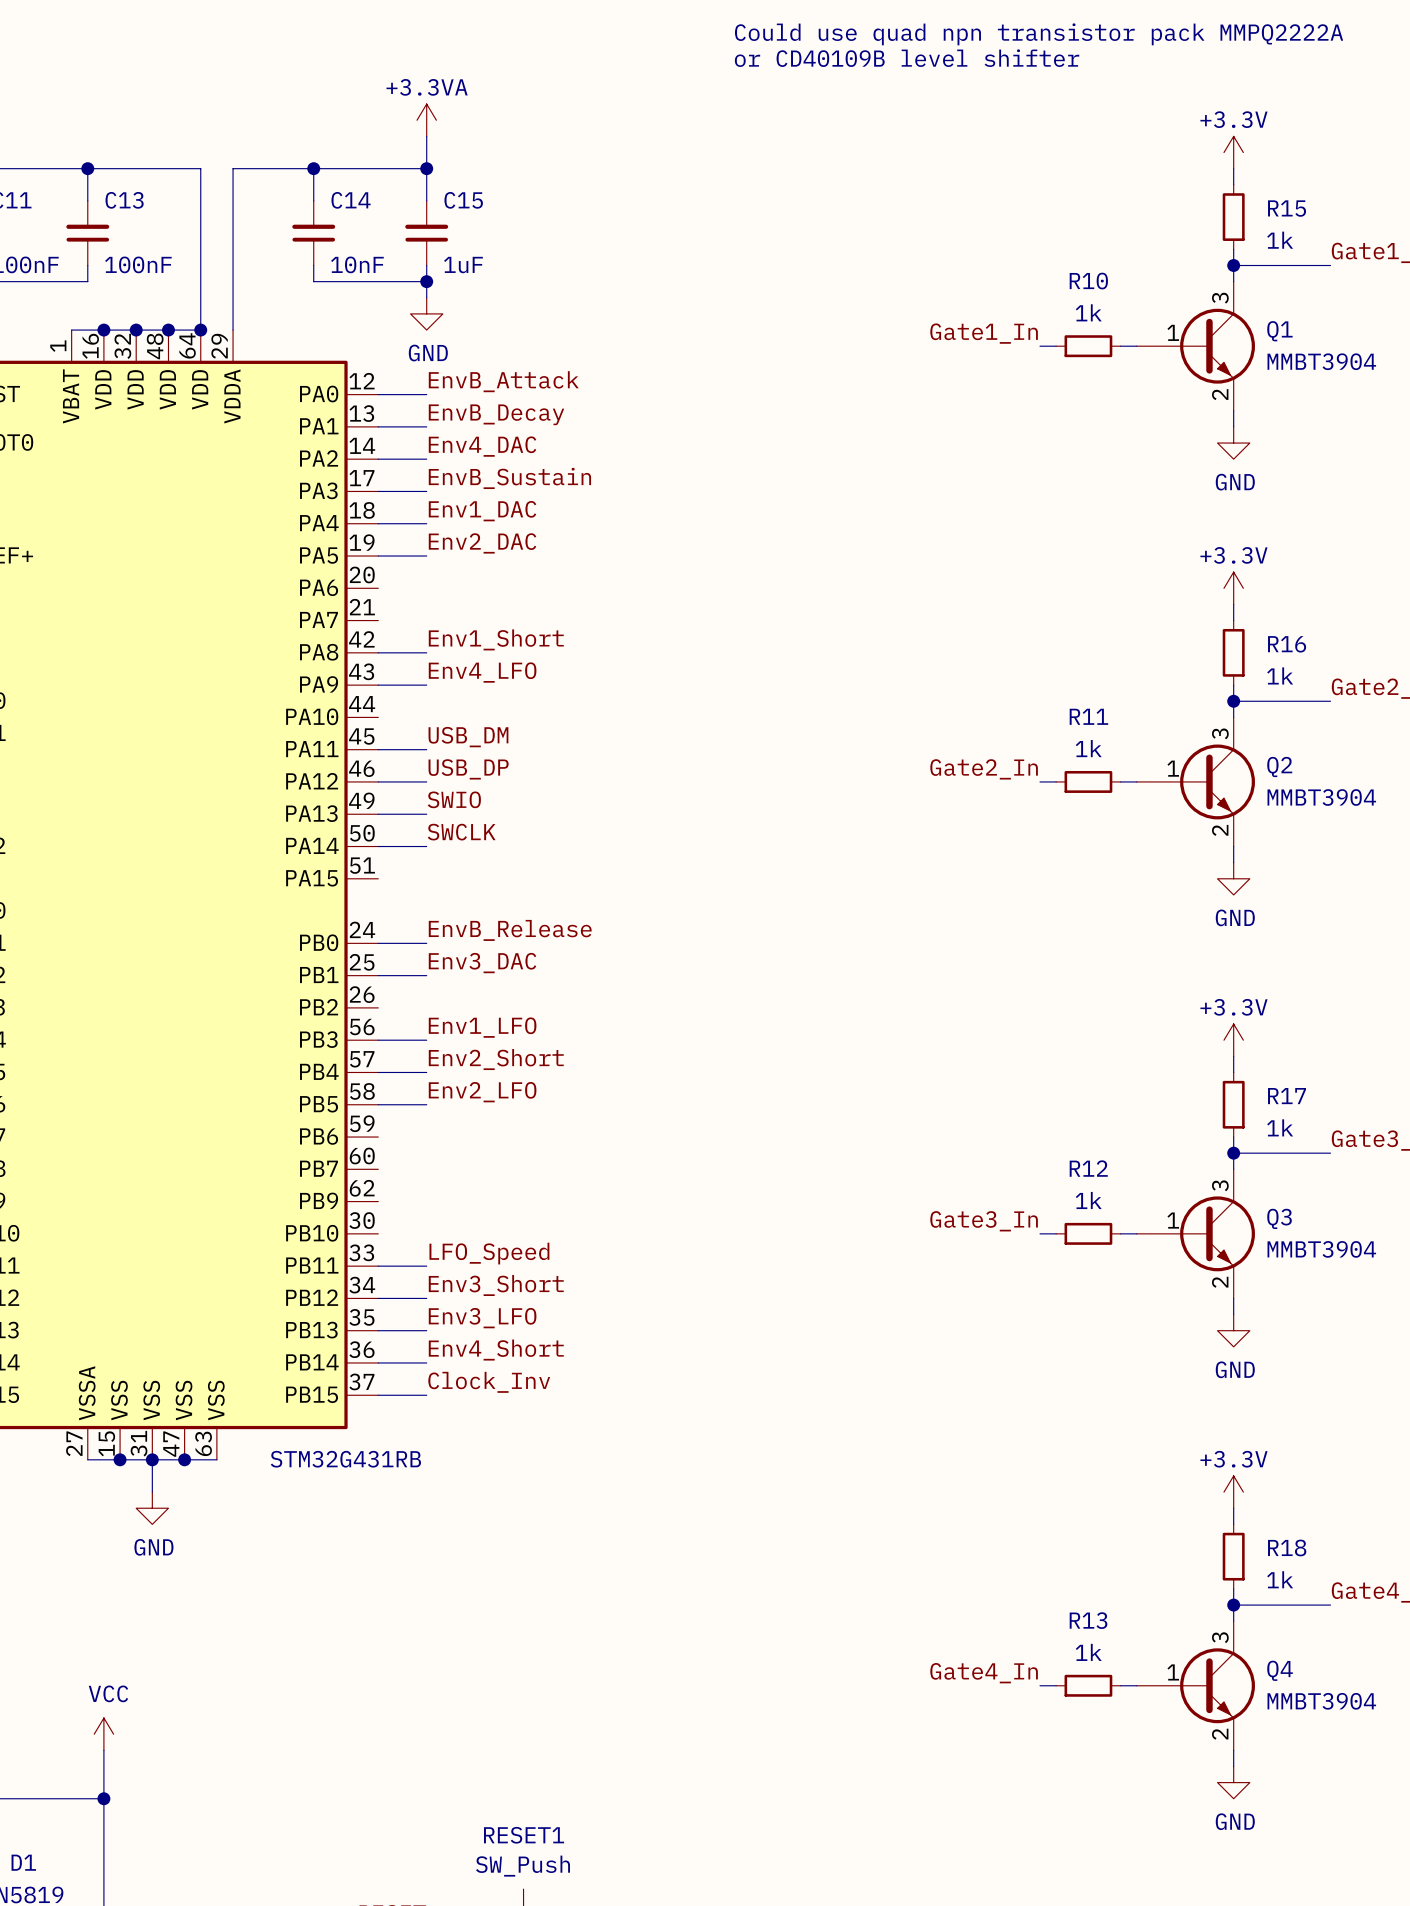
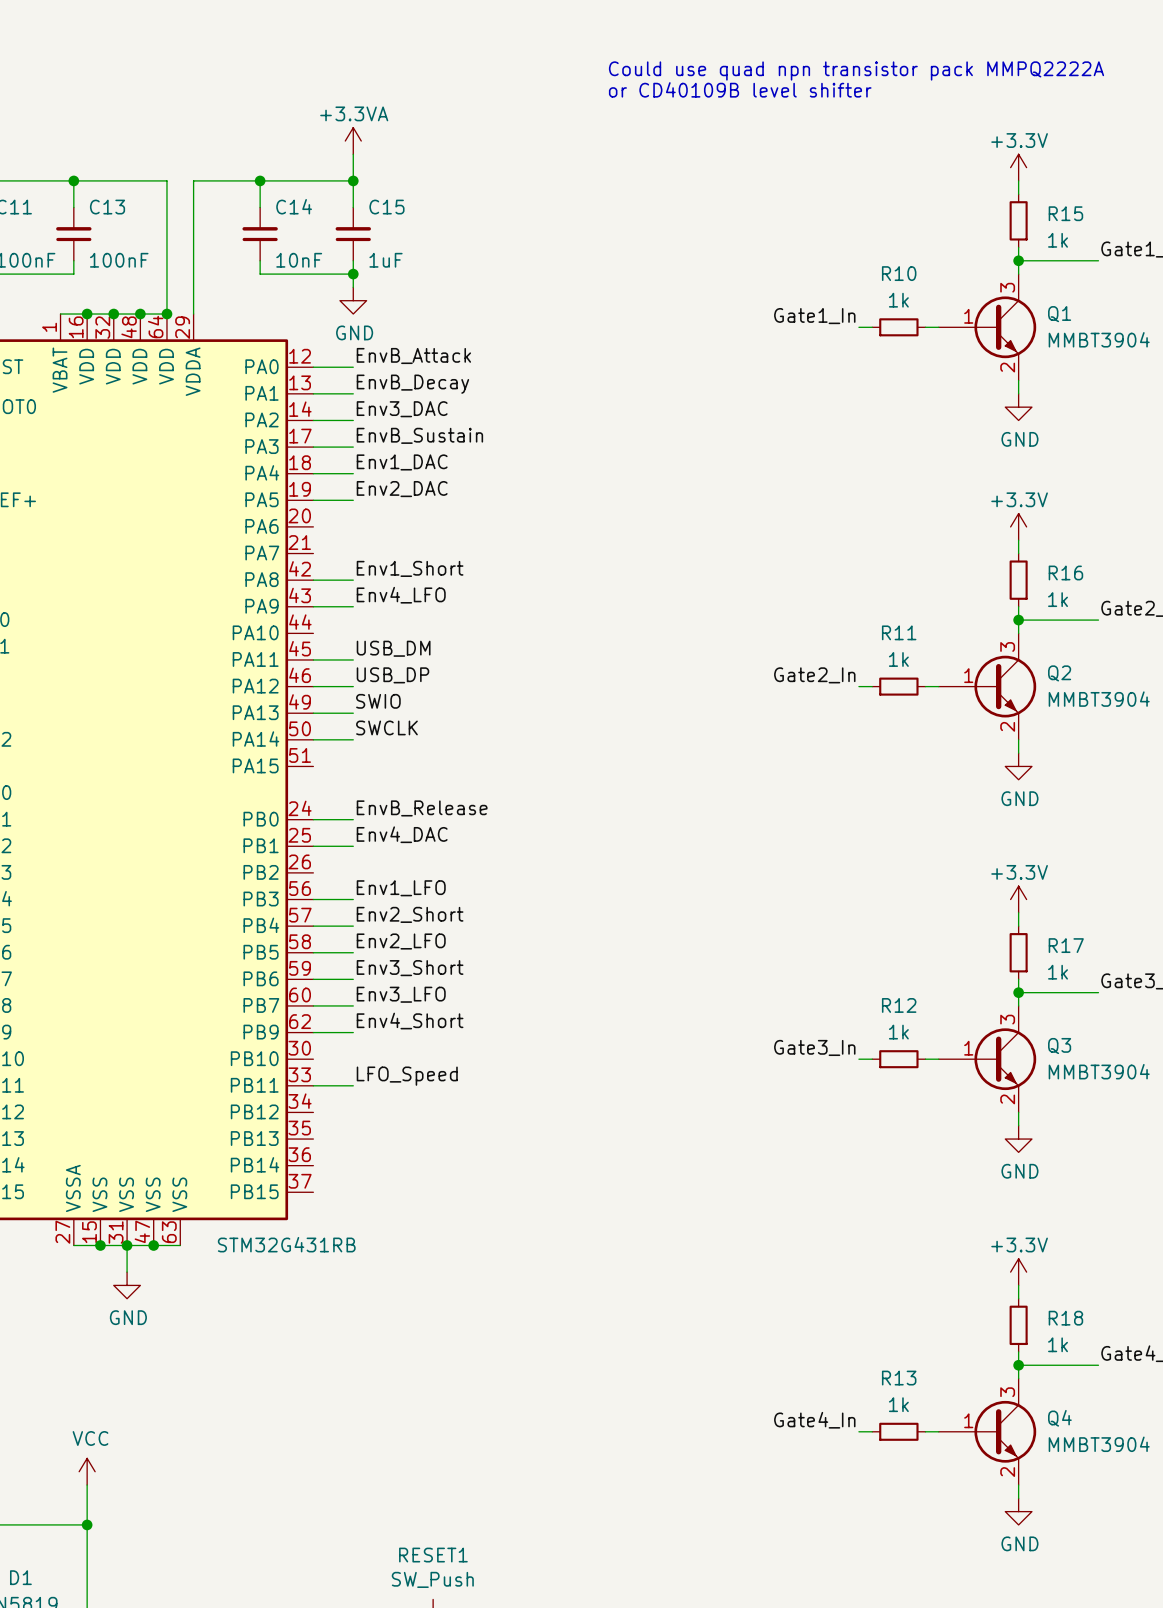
label: Env4_DAC (482, 446) -> Env3_DAC (402, 409)
label: Env3_DAC (482, 963) -> Env4_DAC (402, 834)
label position: Env3_Short (496, 1285) -> Env3_Short (410, 968)
wire: (378, 1298) (426, 1298) -> (313, 1032) (353, 1032)
label position: Env3_LFO (482, 1318) -> Env3_LFO (401, 994)
wire: (378, 1330) (426, 1330) -> (313, 1005) (353, 1005)
label position: Env4_Short (496, 1350) -> Env4_Short (410, 1021)
wire: (378, 1362) (426, 1362) -> (313, 979) (353, 979)
label: Clock_Inv (489, 1382) -> none
wire: (378, 1395) (426, 1395) -> none

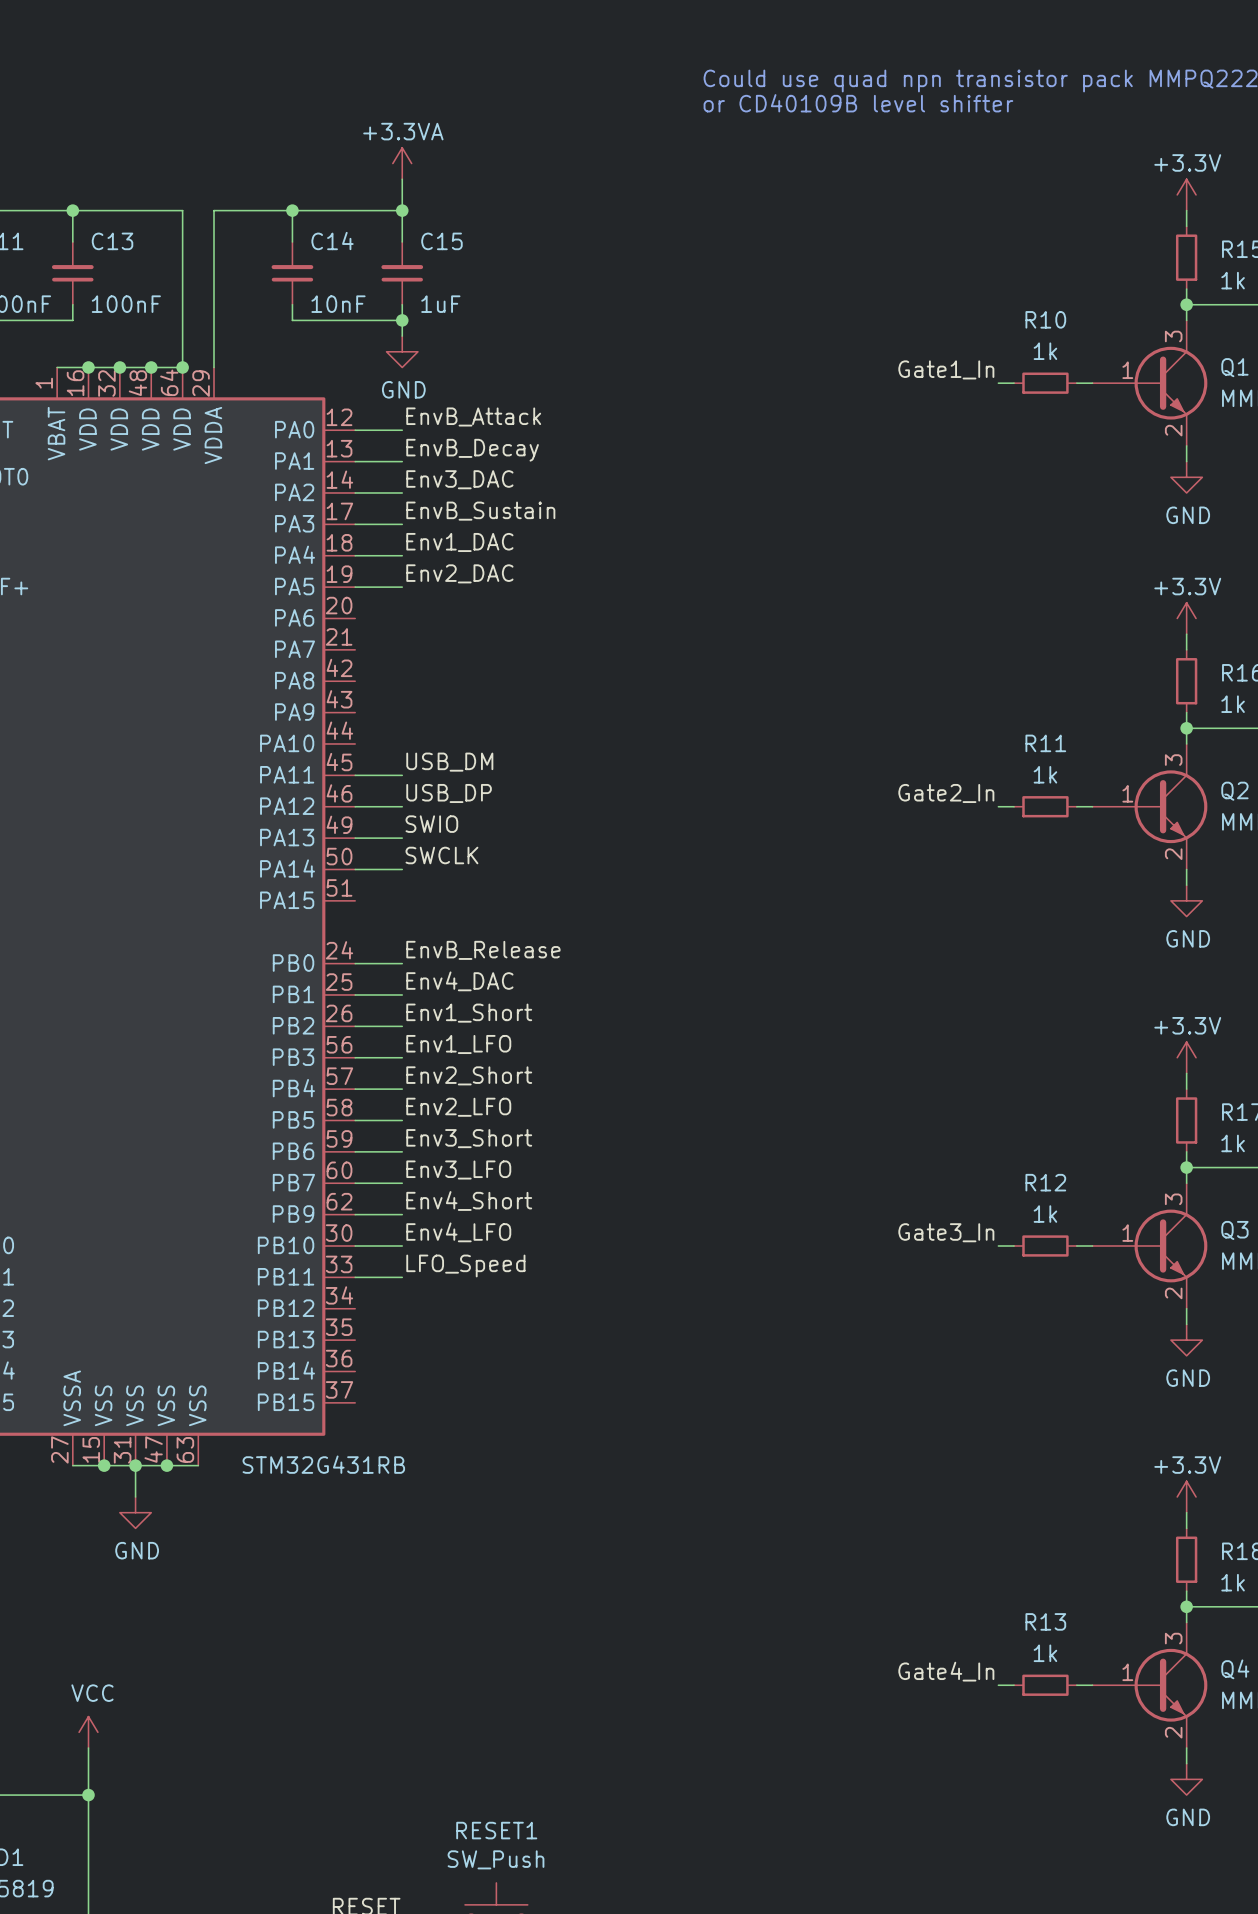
label: Env1_Short (410, 568) -> none
wire: (313, 580) (353, 580) -> none
label: Env4_LFO (401, 595) -> none
wire: (313, 606) (353, 606) -> none
label: none -> Env1_Short (469, 1013)
wire: none -> (355, 1026) (402, 1026)
label: none -> Env4_LFO (458, 1232)
wire: none -> (355, 1245) (402, 1245)

